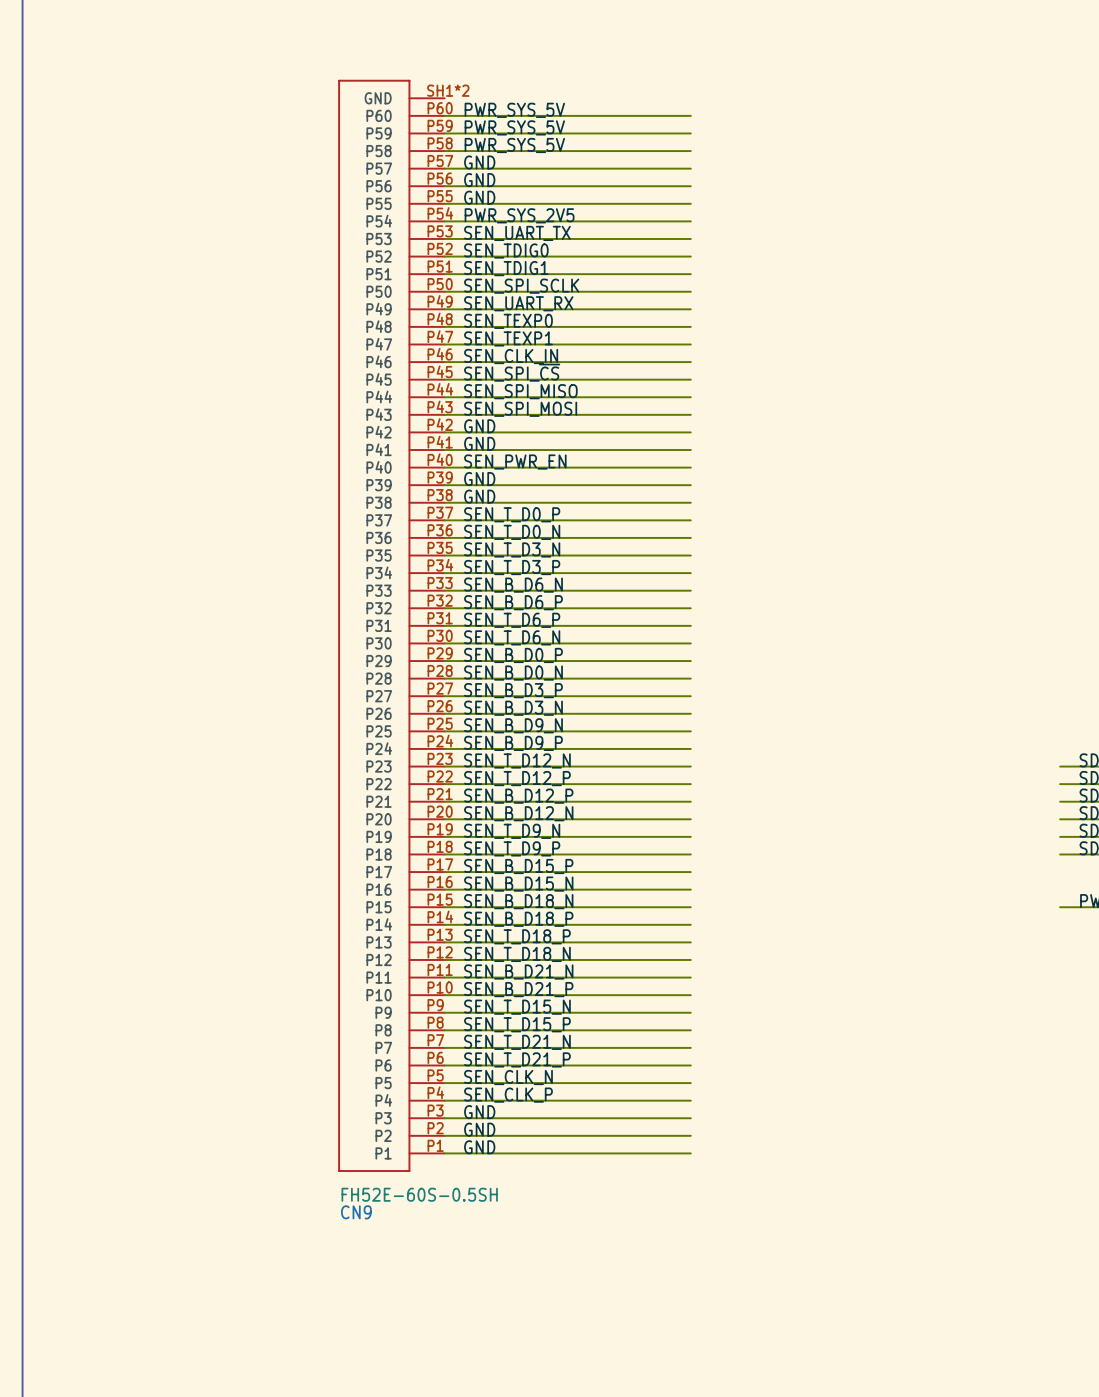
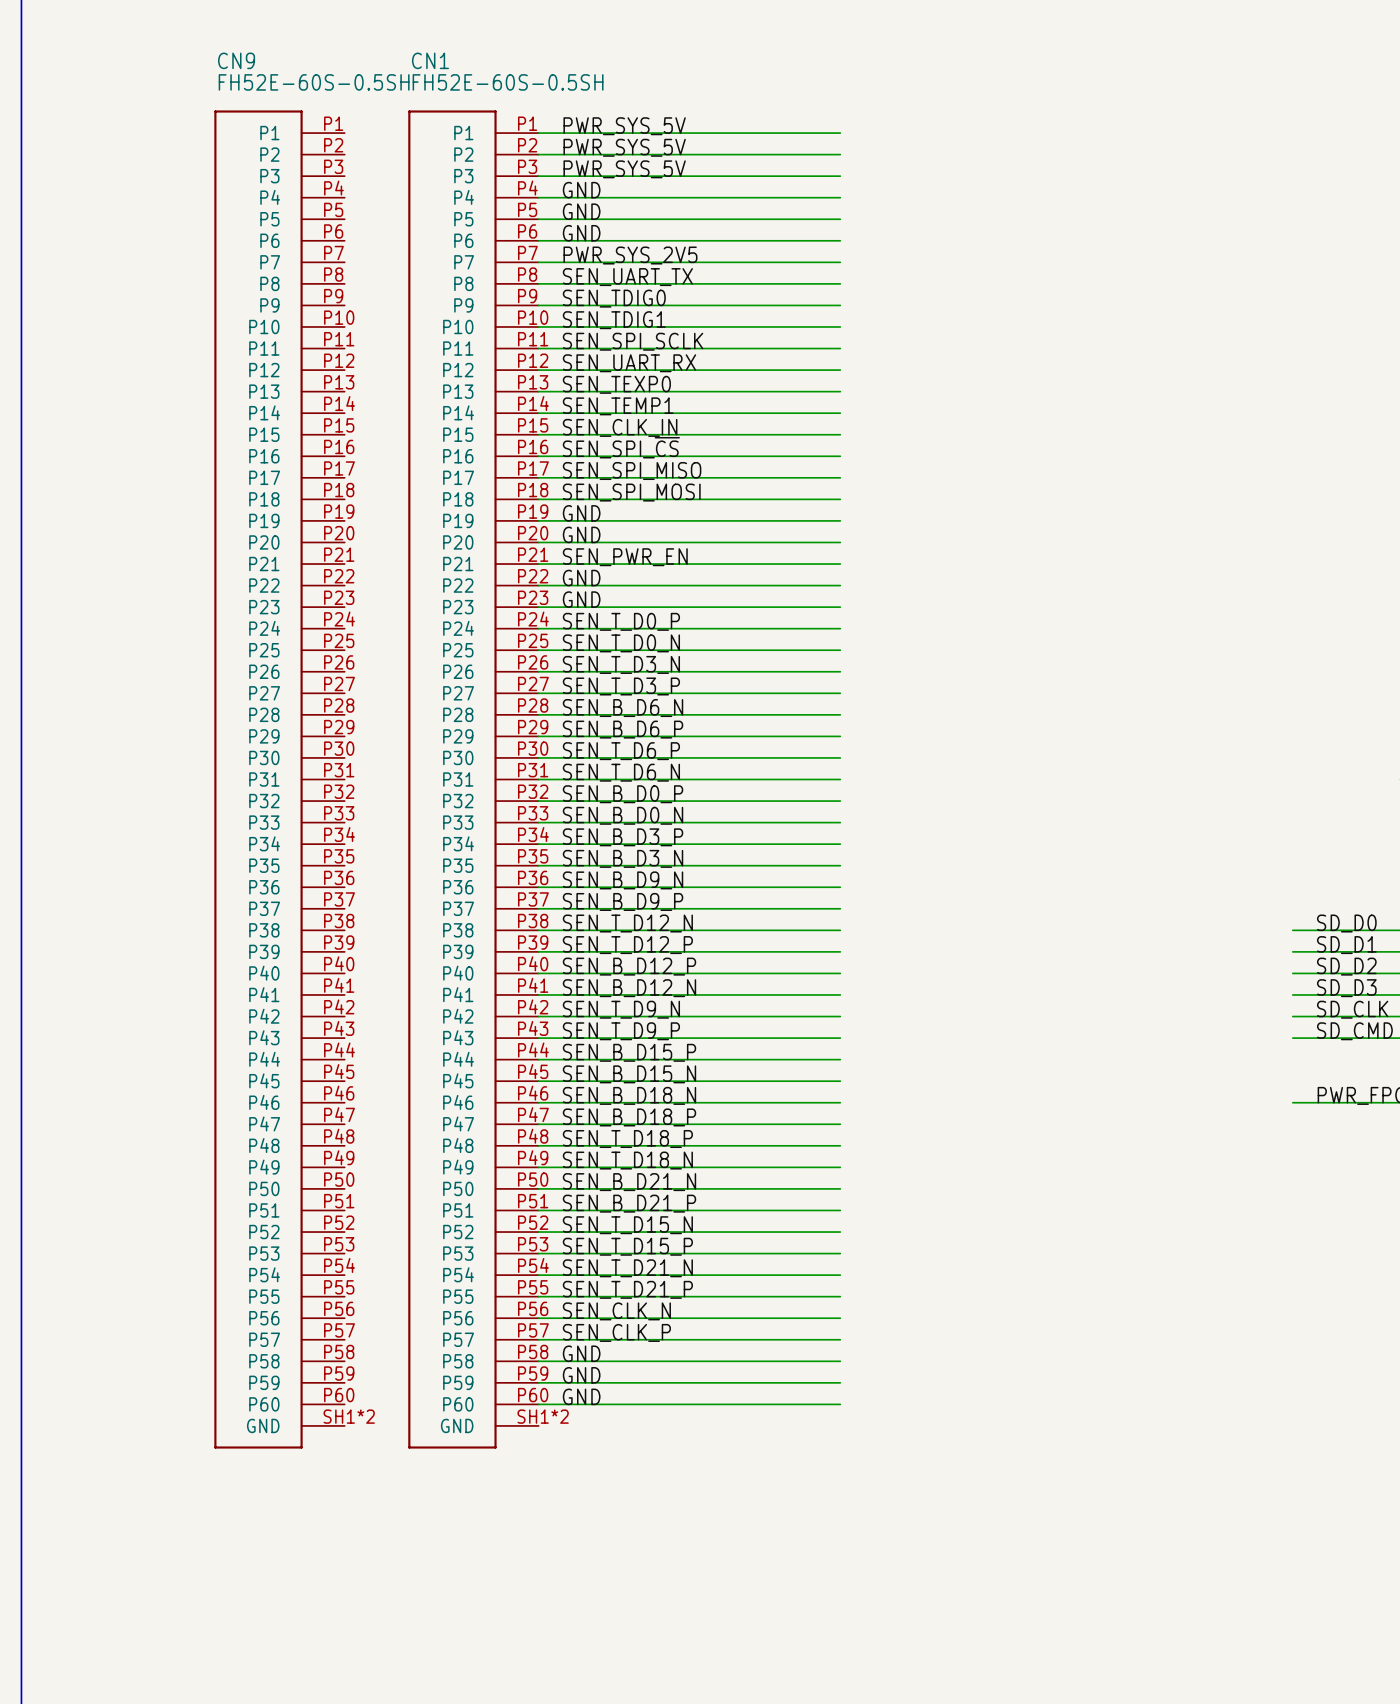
label: SEN_TEXP1 (508, 338) -> SEN_TEMP1 (618, 406)
CN9 flip: as is (374, 625) -> up-down (258, 779)
CN1: none -> FH52E-60S-0.5SH (473, 779)

